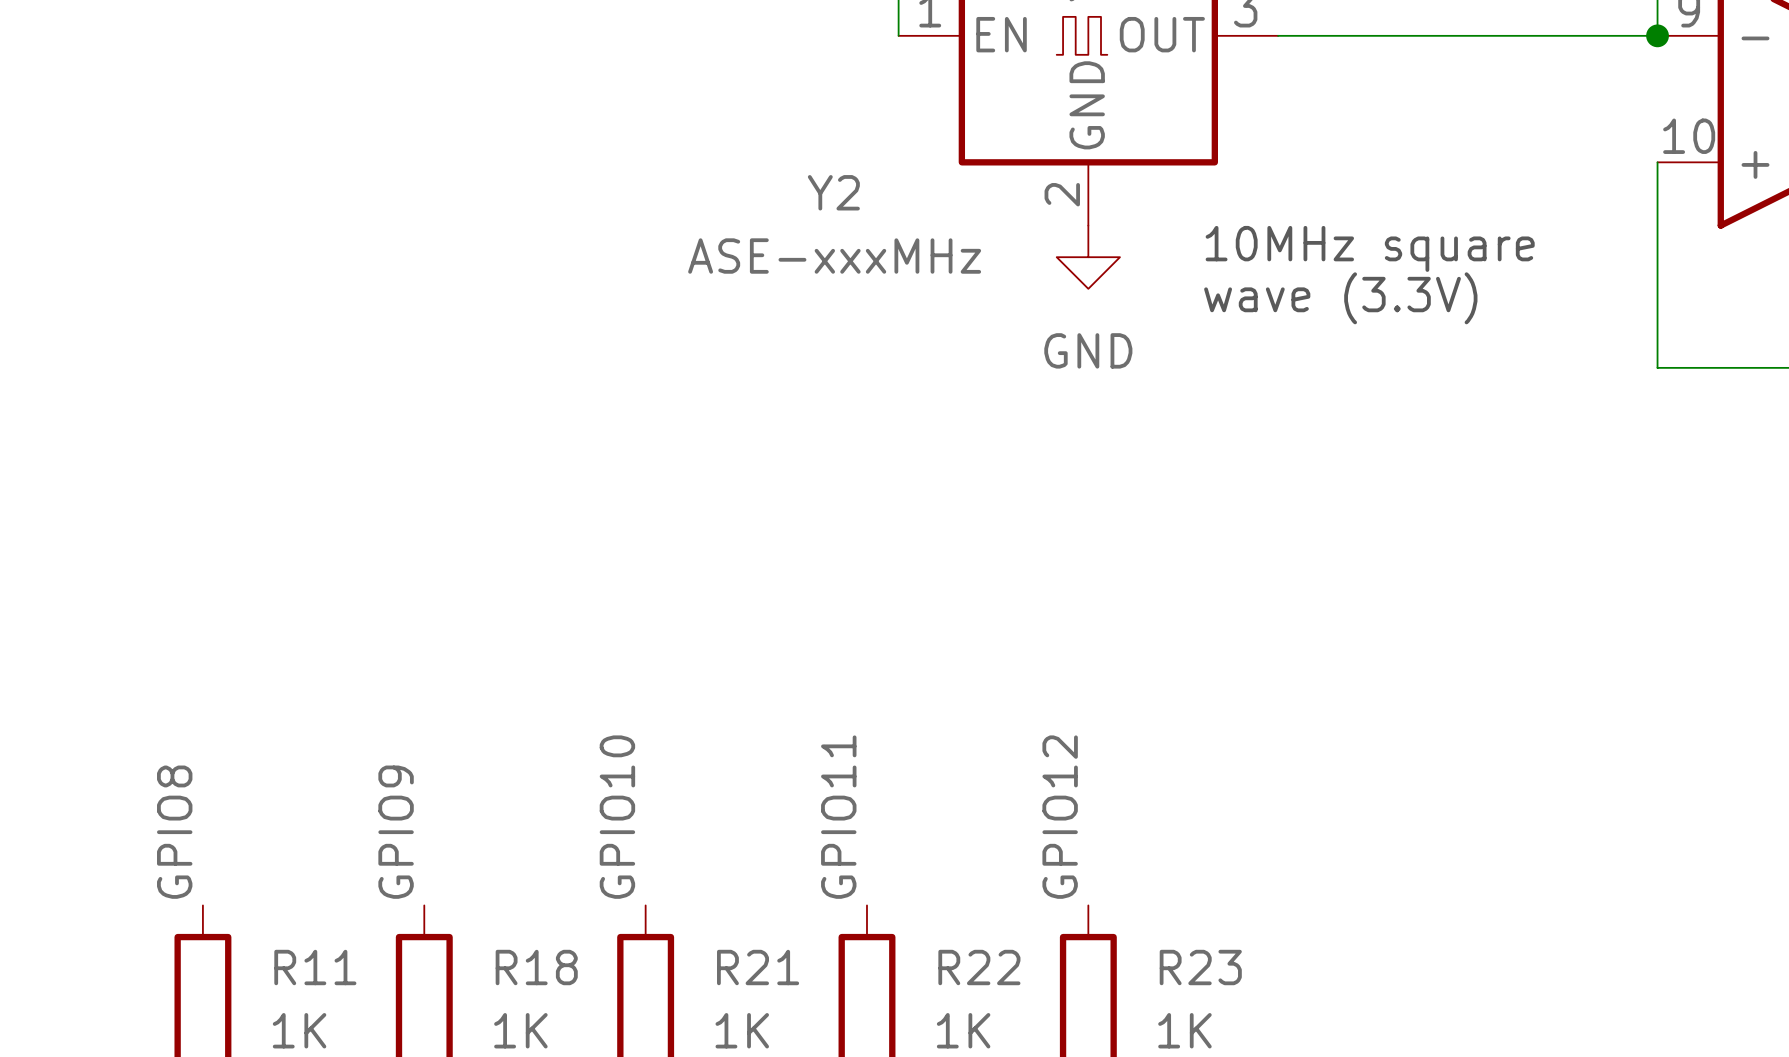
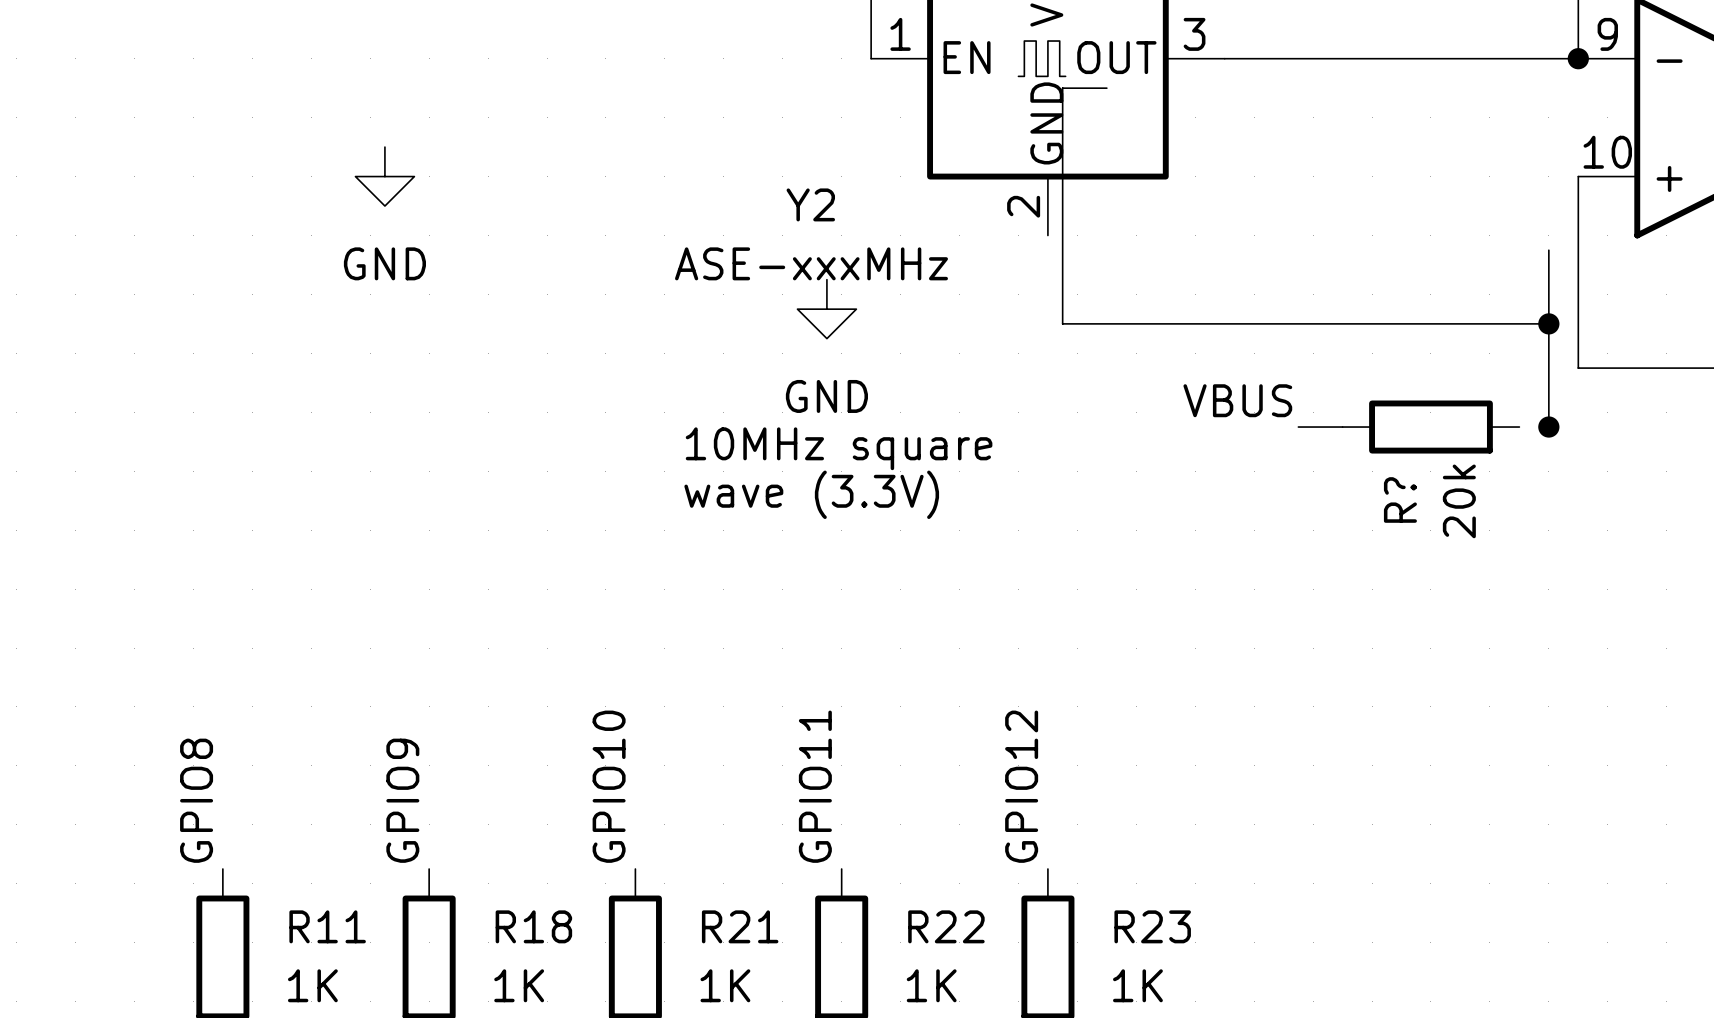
wire: none -> (1106, 88) (1062, 88) (1062, 323) (1548, 323)
power symbol: none -> GND (384, 176)
wire: none -> (1548, 250) (1548, 427)
text position: 10MHz square (1370, 248) -> 10MHz square (839, 448)
power symbol position: GND (1088, 257) -> GND (826, 309)
text: wave (3.3V) (1340, 298) -> none
junction: none -> (1548, 323)
label: none -> VBUS (1237, 400)
wire: none -> (1298, 427) (1342, 427)
R?: none -> 20k (1430, 427)
junction: none -> (1548, 427)
text: none -> wave (3.3V) (811, 494)

